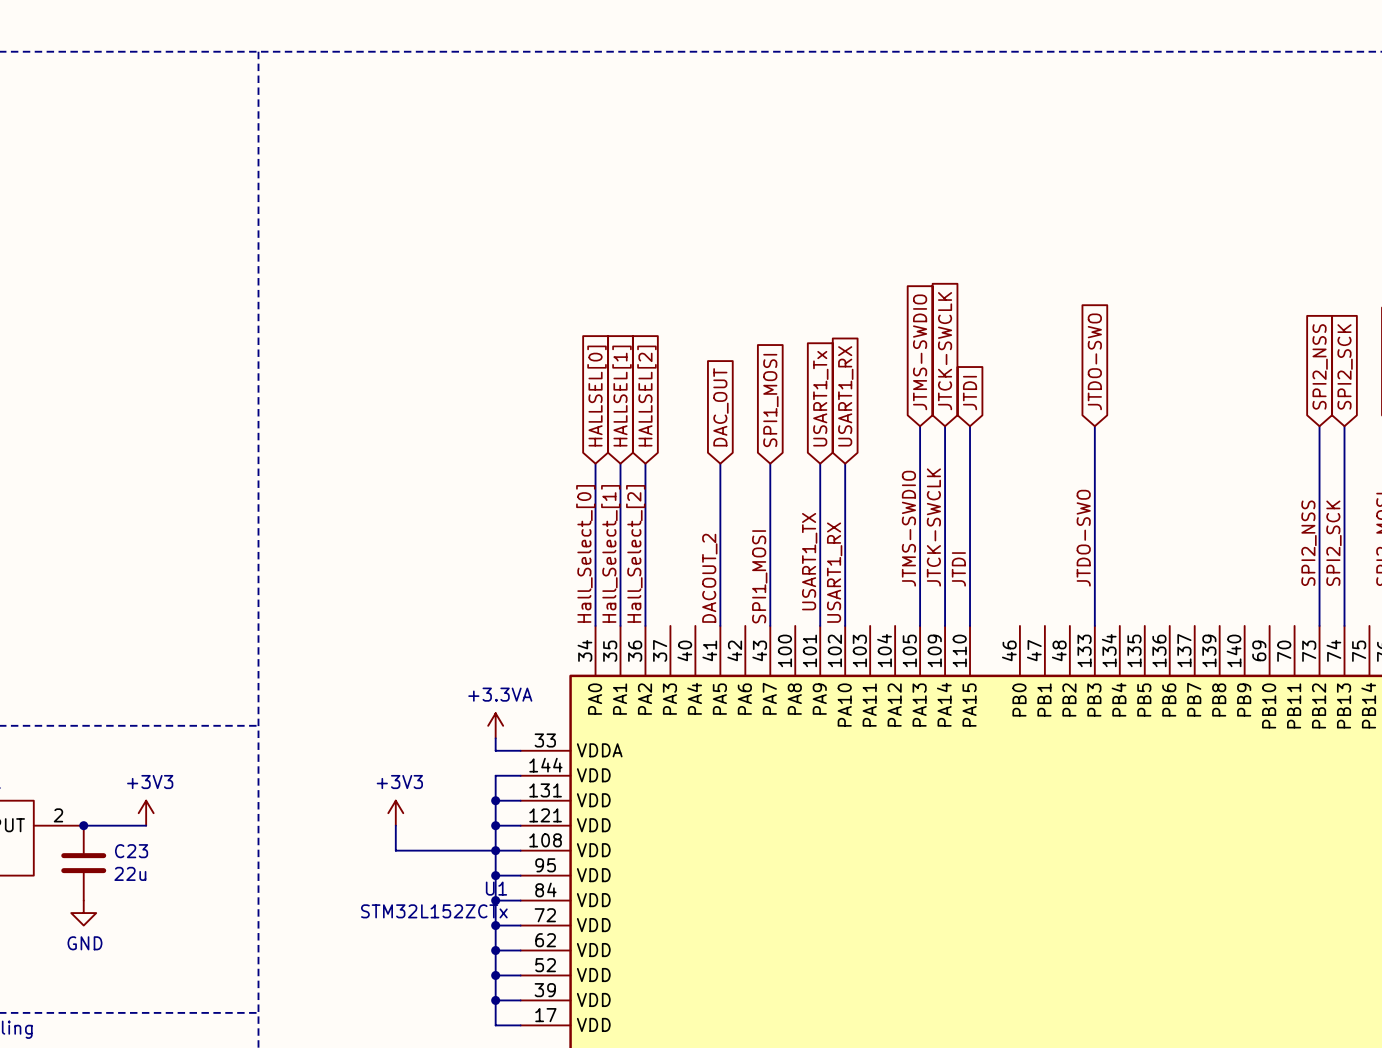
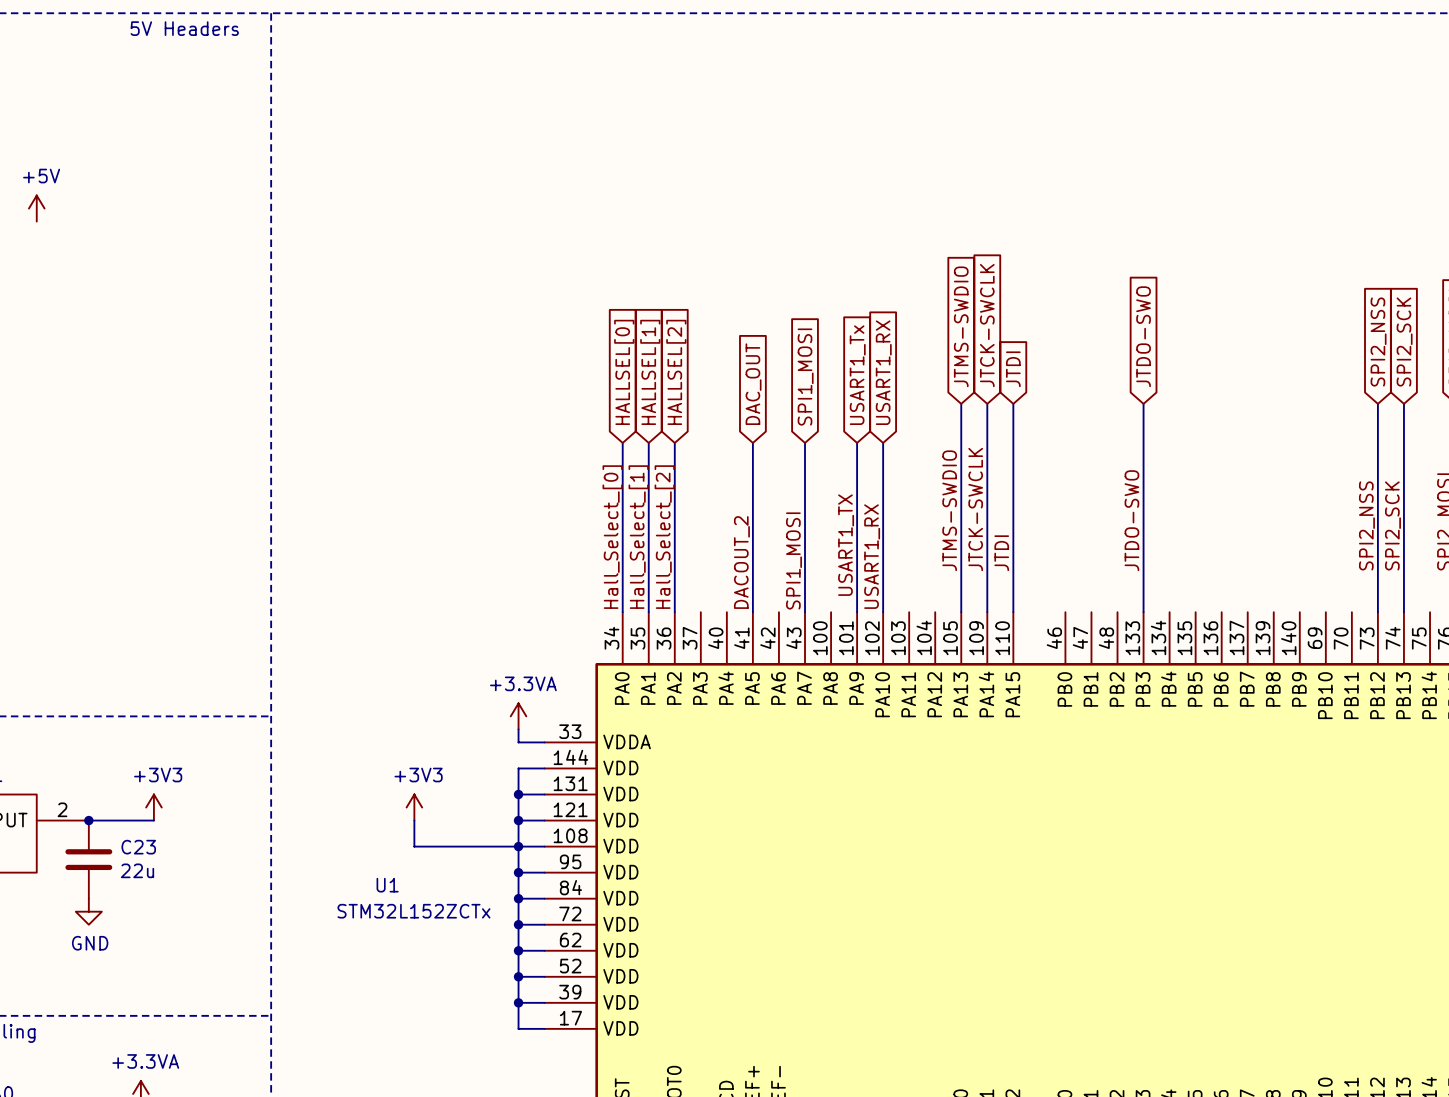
text: none -> 5V Headers (184, 28)
power symbol: none -> +5V (36, 208)
U1 name position: U1 (496, 888) -> U1 (387, 885)
U1 value position: STM32L152ZCTx (434, 911) -> STM32L152ZCTx (413, 911)

